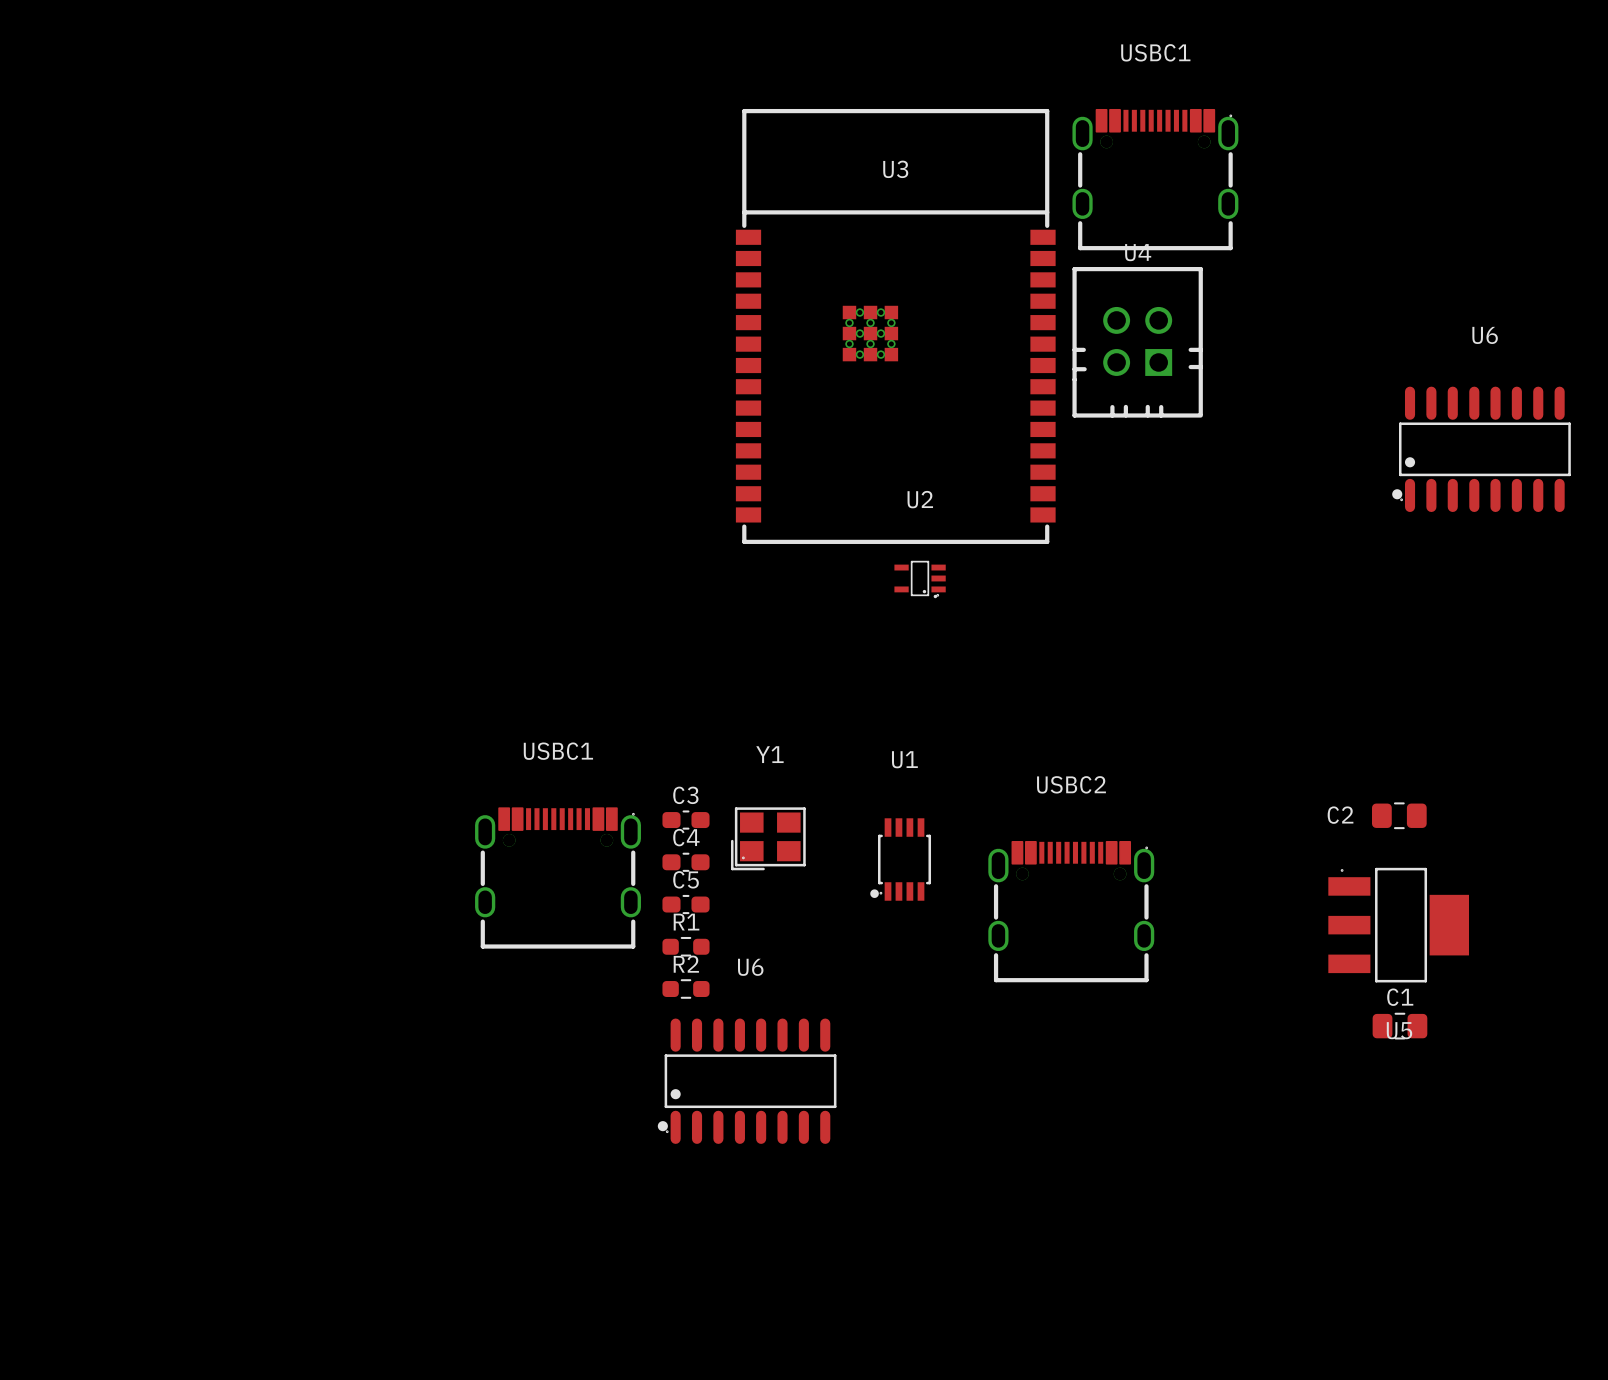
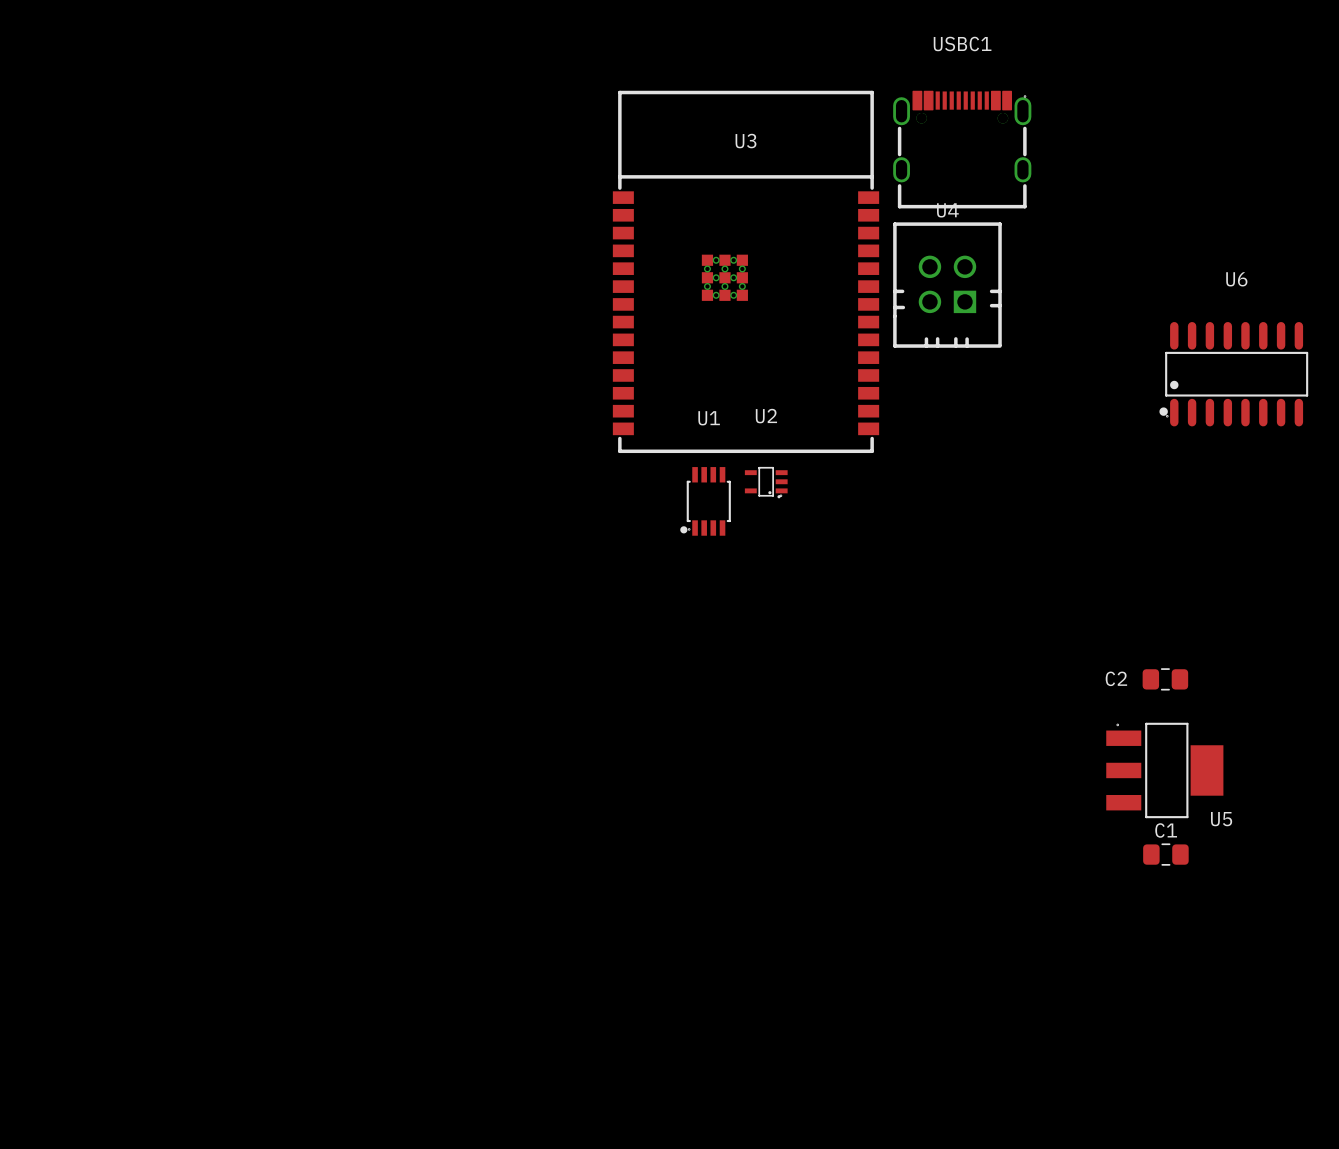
C3: (686, 820) -> none
Y1: (768, 838) -> none
U1 position: (900, 859) -> (705, 501)
C4: (686, 862) -> none
USBC1: (558, 877) -> none
C5: (686, 904) -> none
USBC2: (1071, 911) -> none
R1: (686, 946) -> none
R2: (686, 989) -> none
U5 name position: U5 (1399, 1030) -> U5 (1221, 819)
U6: (747, 1081) -> none

